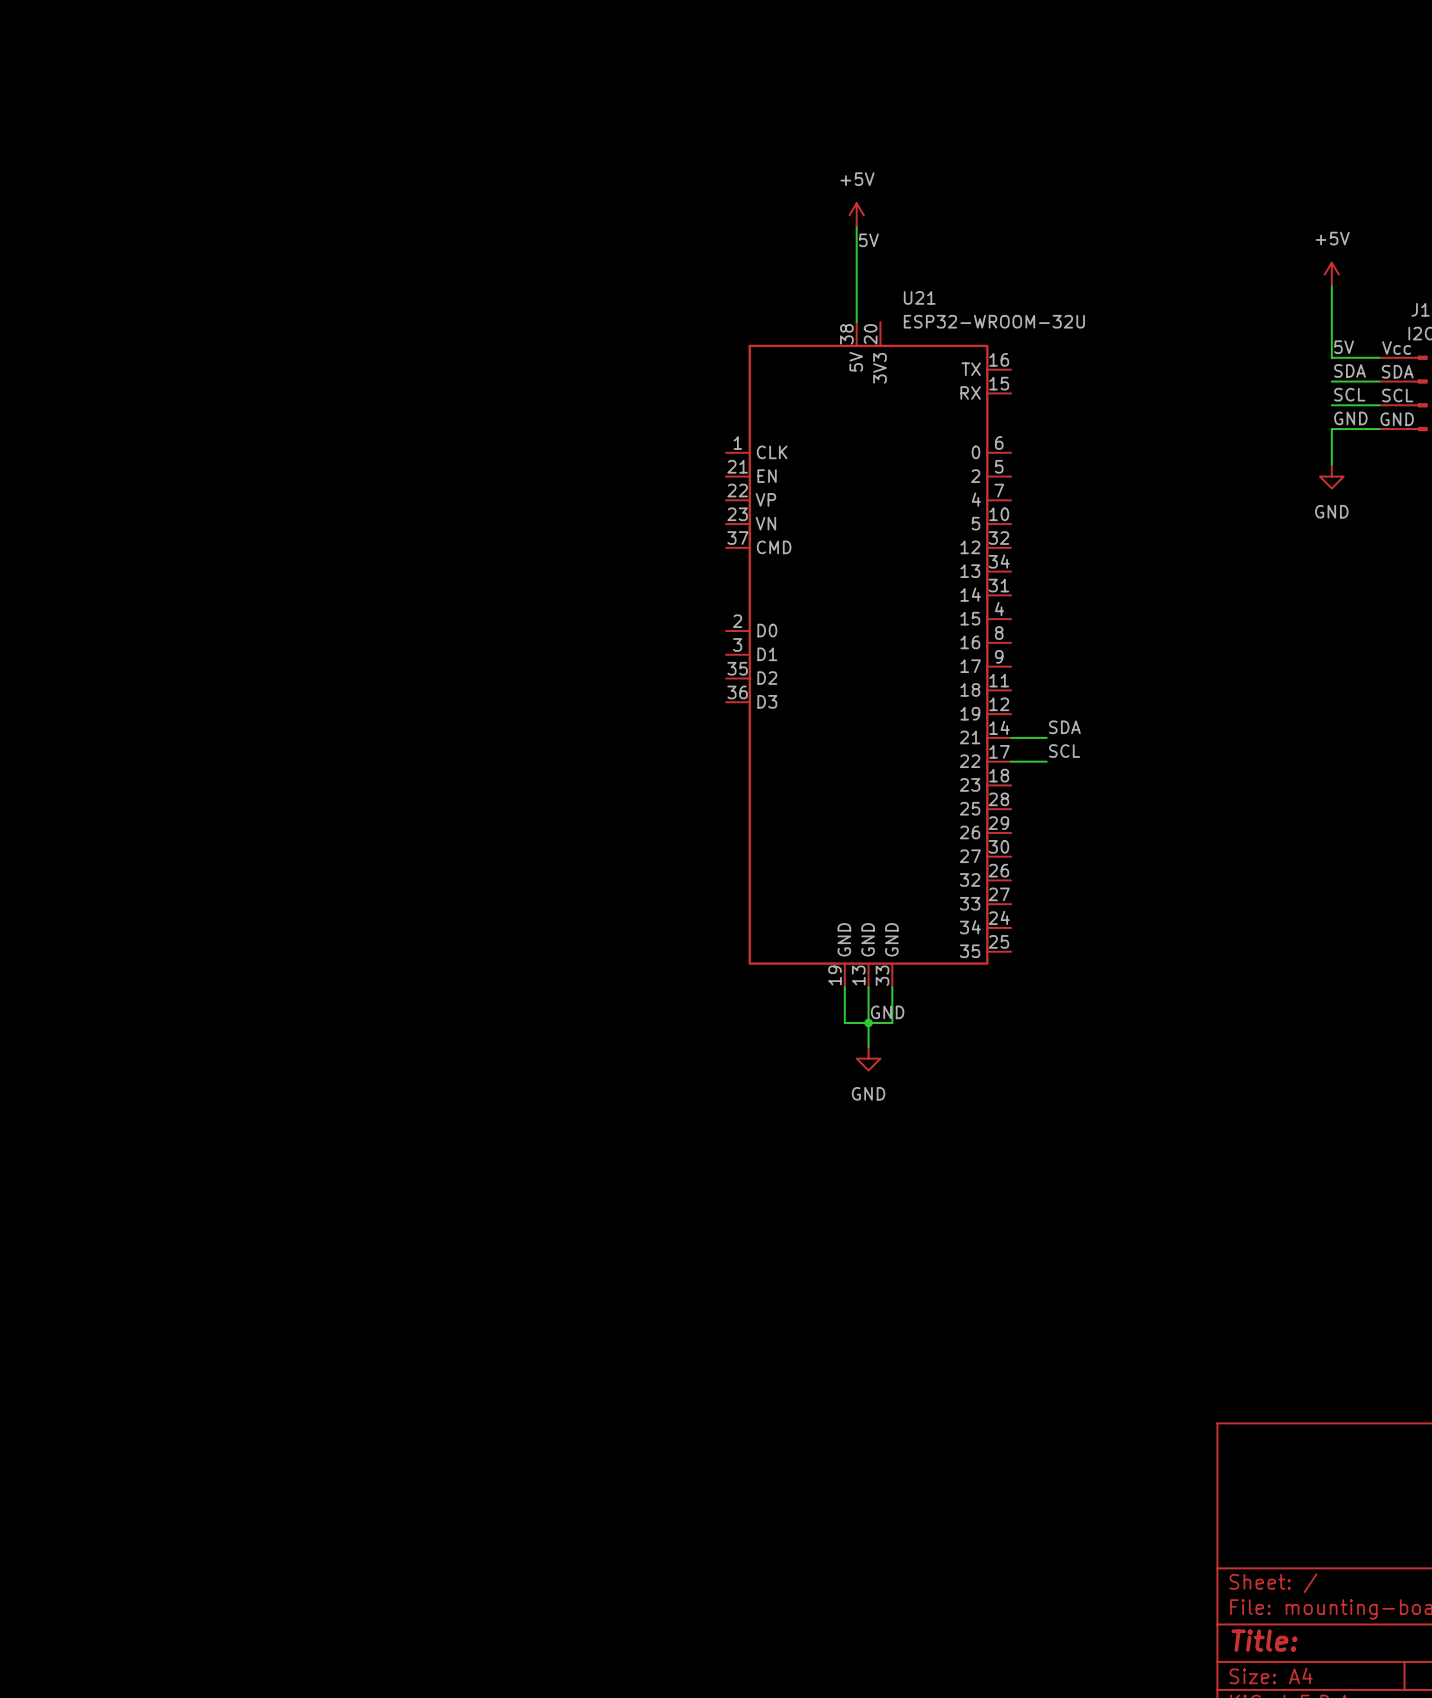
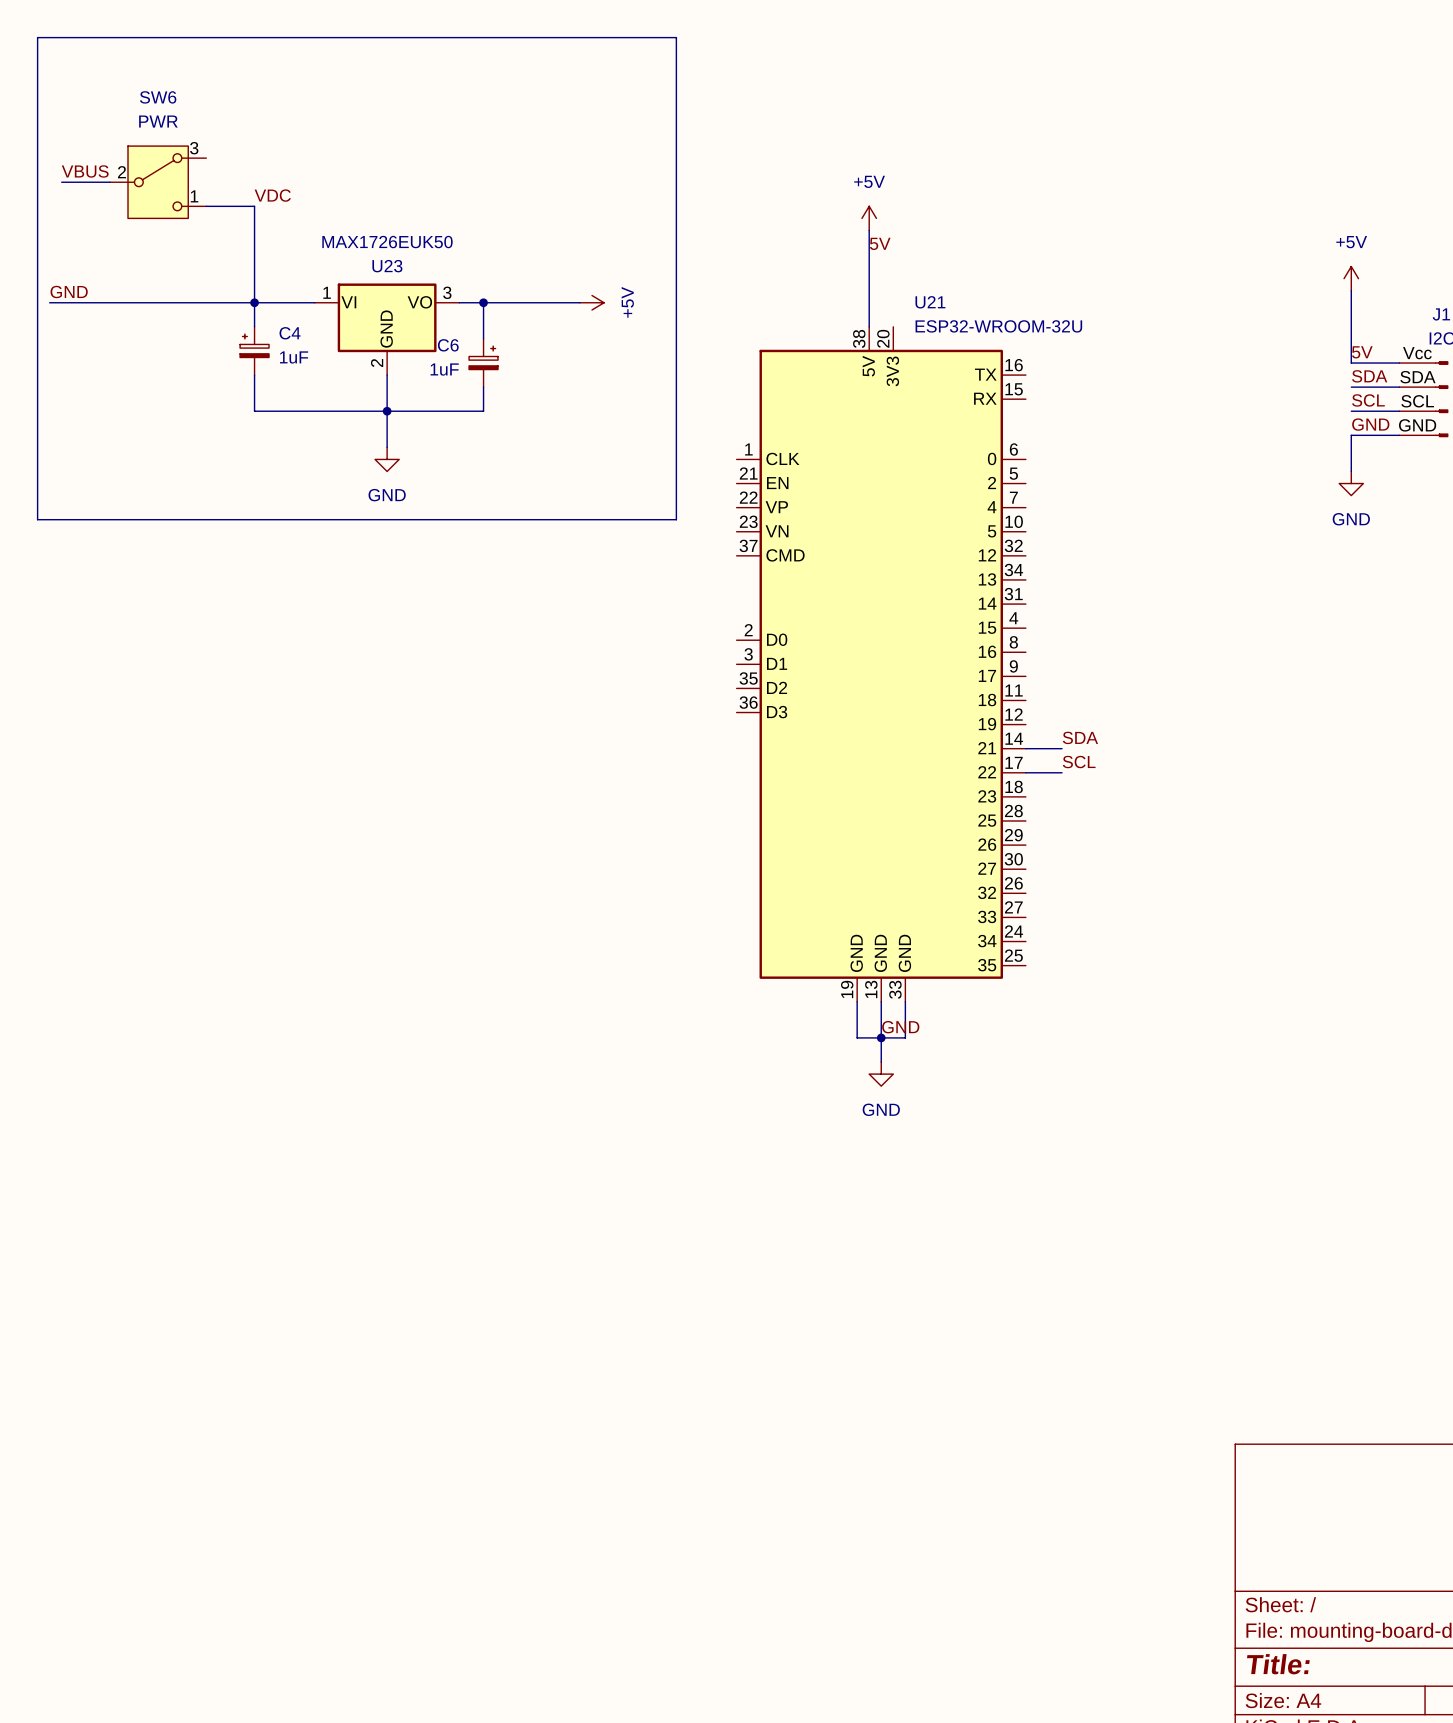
line: none -> (37, 37) (676, 37) (676, 519) (37, 519) (37, 37)
label: none -> VBUS (85, 171)
wire: none -> (61, 182) (109, 182)
SW6: none -> PWR (158, 182)
label: none -> VDC (272, 195)
wire: none -> (206, 206) (254, 206) (254, 326)
label: none -> GND (69, 291)
wire: none -> (49, 302) (314, 302)
junction: none -> (254, 302)
wire: none -> (459, 302) (579, 302)
wire: none -> (483, 302) (483, 338)
junction: none -> (483, 302)
power symbol: none -> +5V (592, 302)
U23: none -> MAX1726EUK50 (387, 329)
C4: none -> 1uF (254, 350)
C6: none -> 1uF (483, 363)
wire: none -> (254, 375) (254, 411) (483, 411) (483, 387)
wire: none -> (387, 375) (387, 447)
junction: none -> (387, 411)
power symbol: none -> GND (387, 459)

